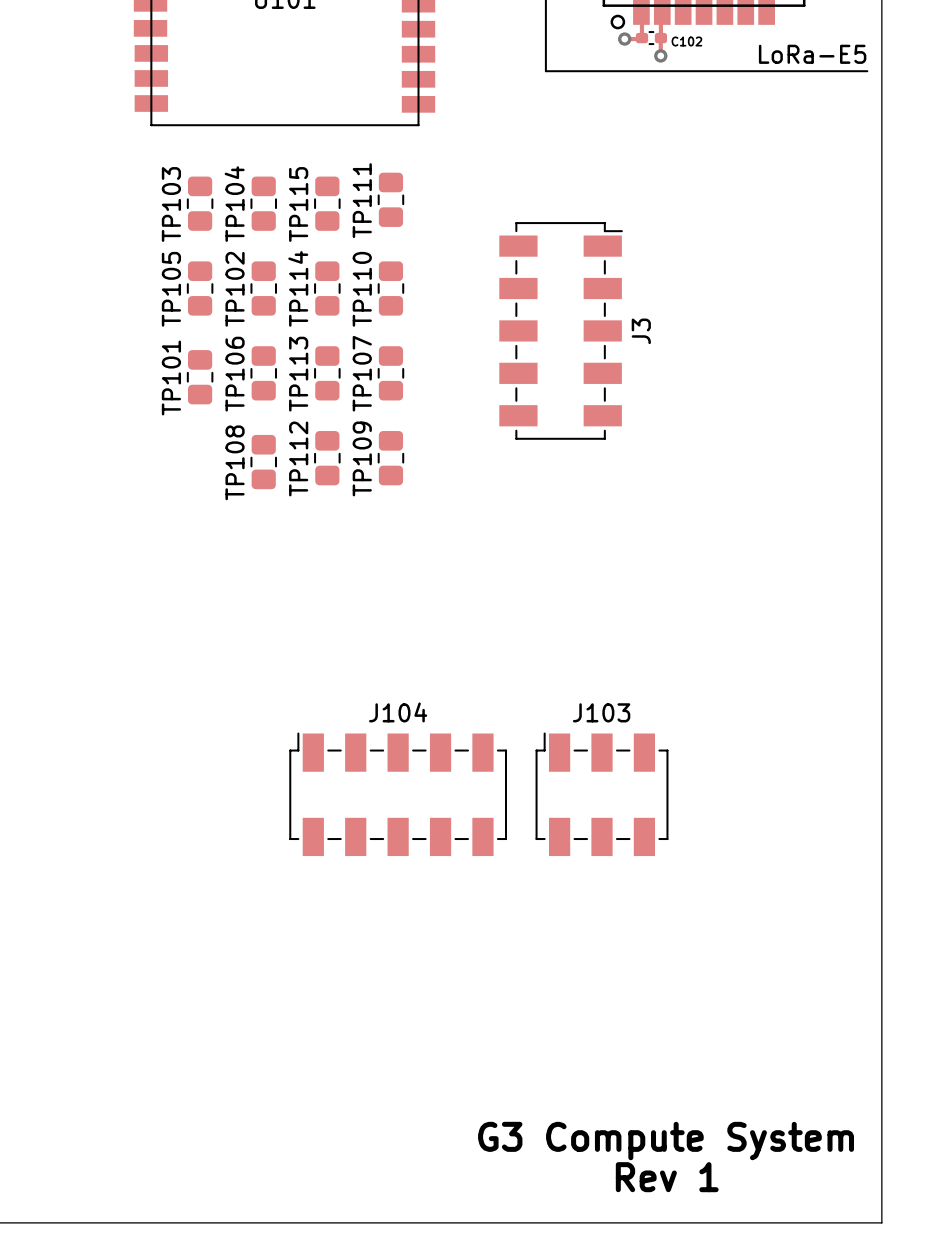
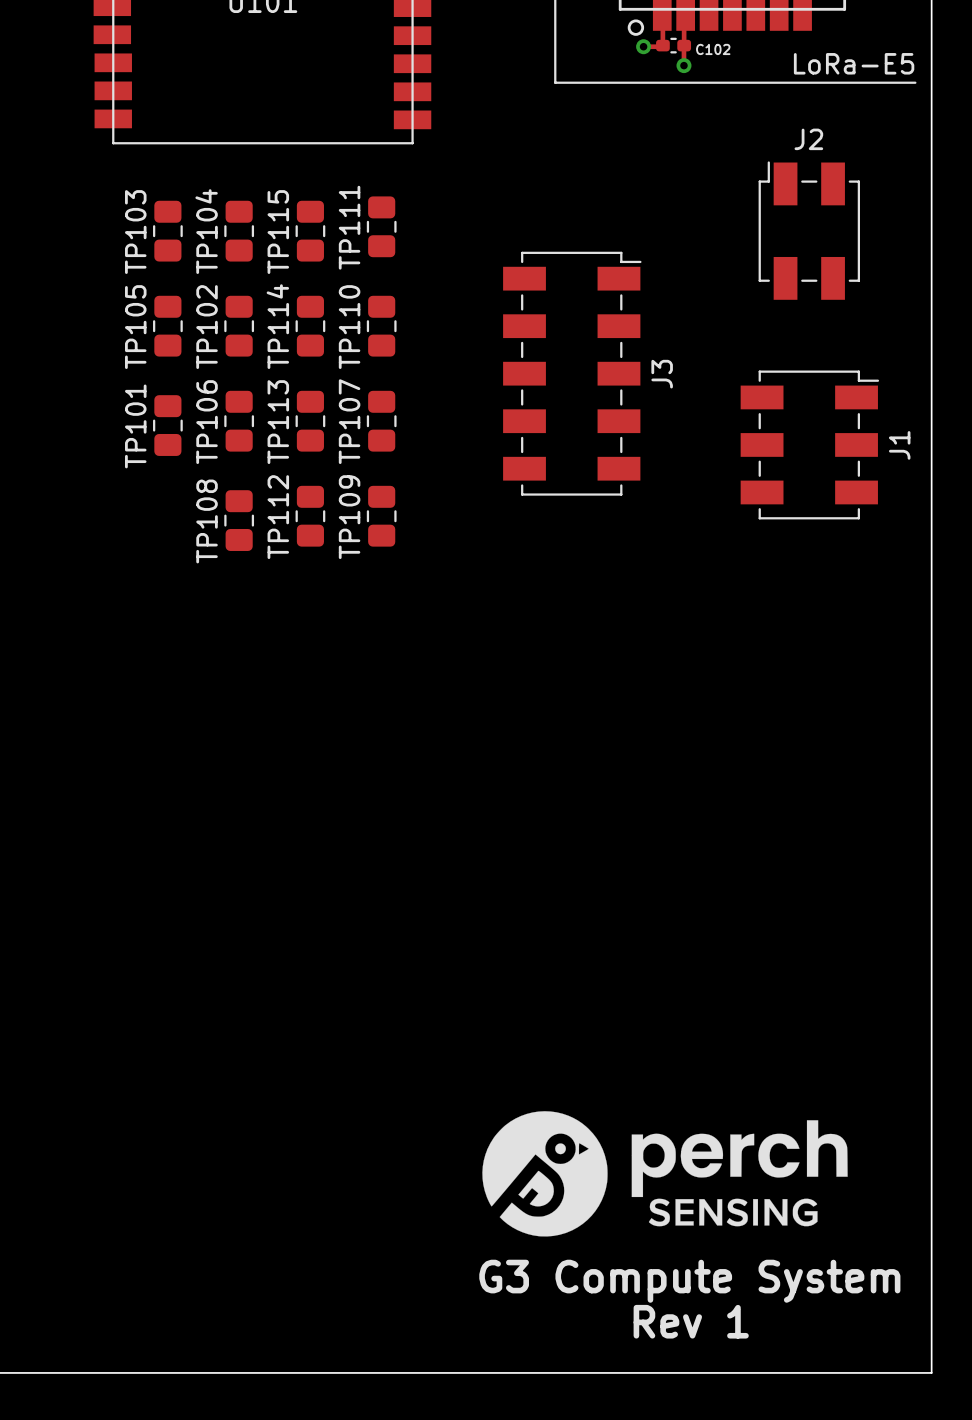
J2: none -> (809, 230)
J1: none -> (809, 444)
J104: (398, 794) -> none
J103: (602, 794) -> none
drawing: none -> [482, 1111, 848, 1237]

